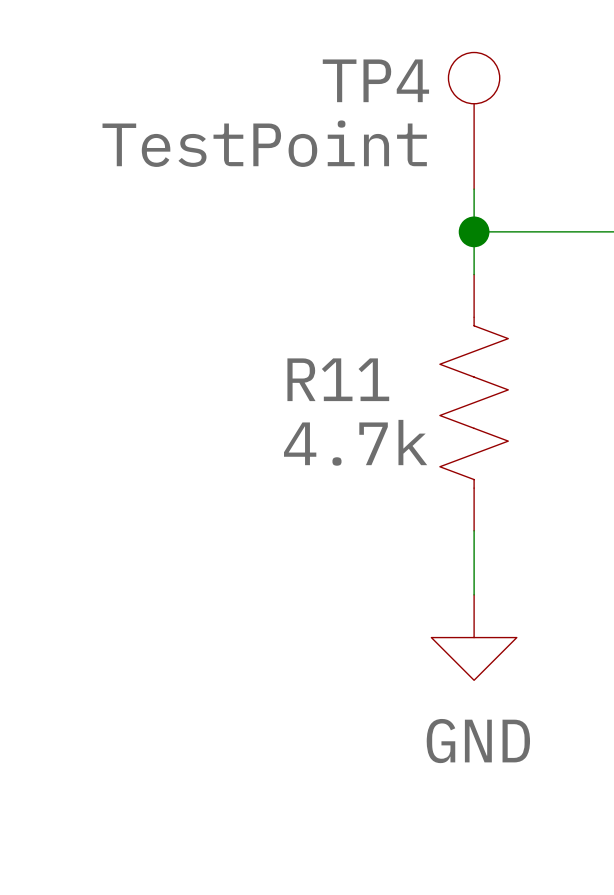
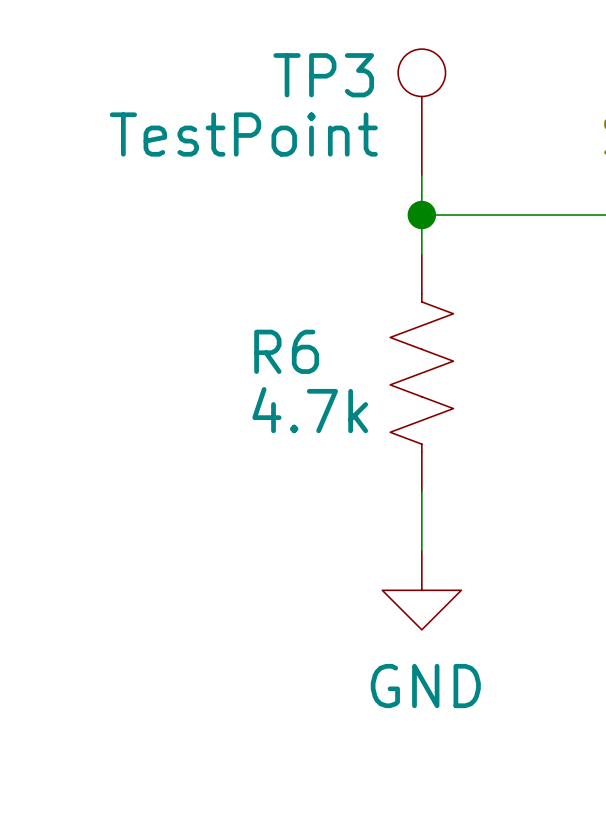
TP4 name: TP4 (375, 80) -> TP3 (323, 75)
R11 name: R11 (338, 379) -> R6 (286, 351)

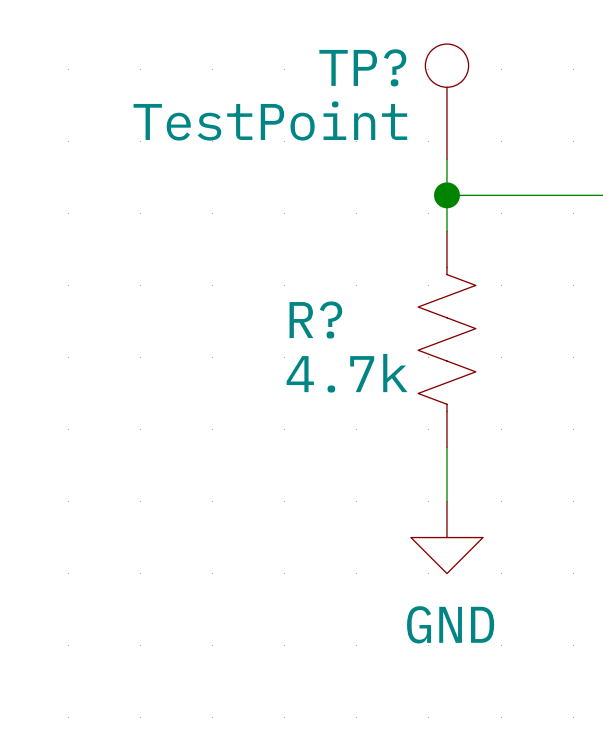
TP3 name: TP3 (323, 75) -> TP? (362, 67)
R6 name: R6 (286, 351) -> R? (315, 320)

